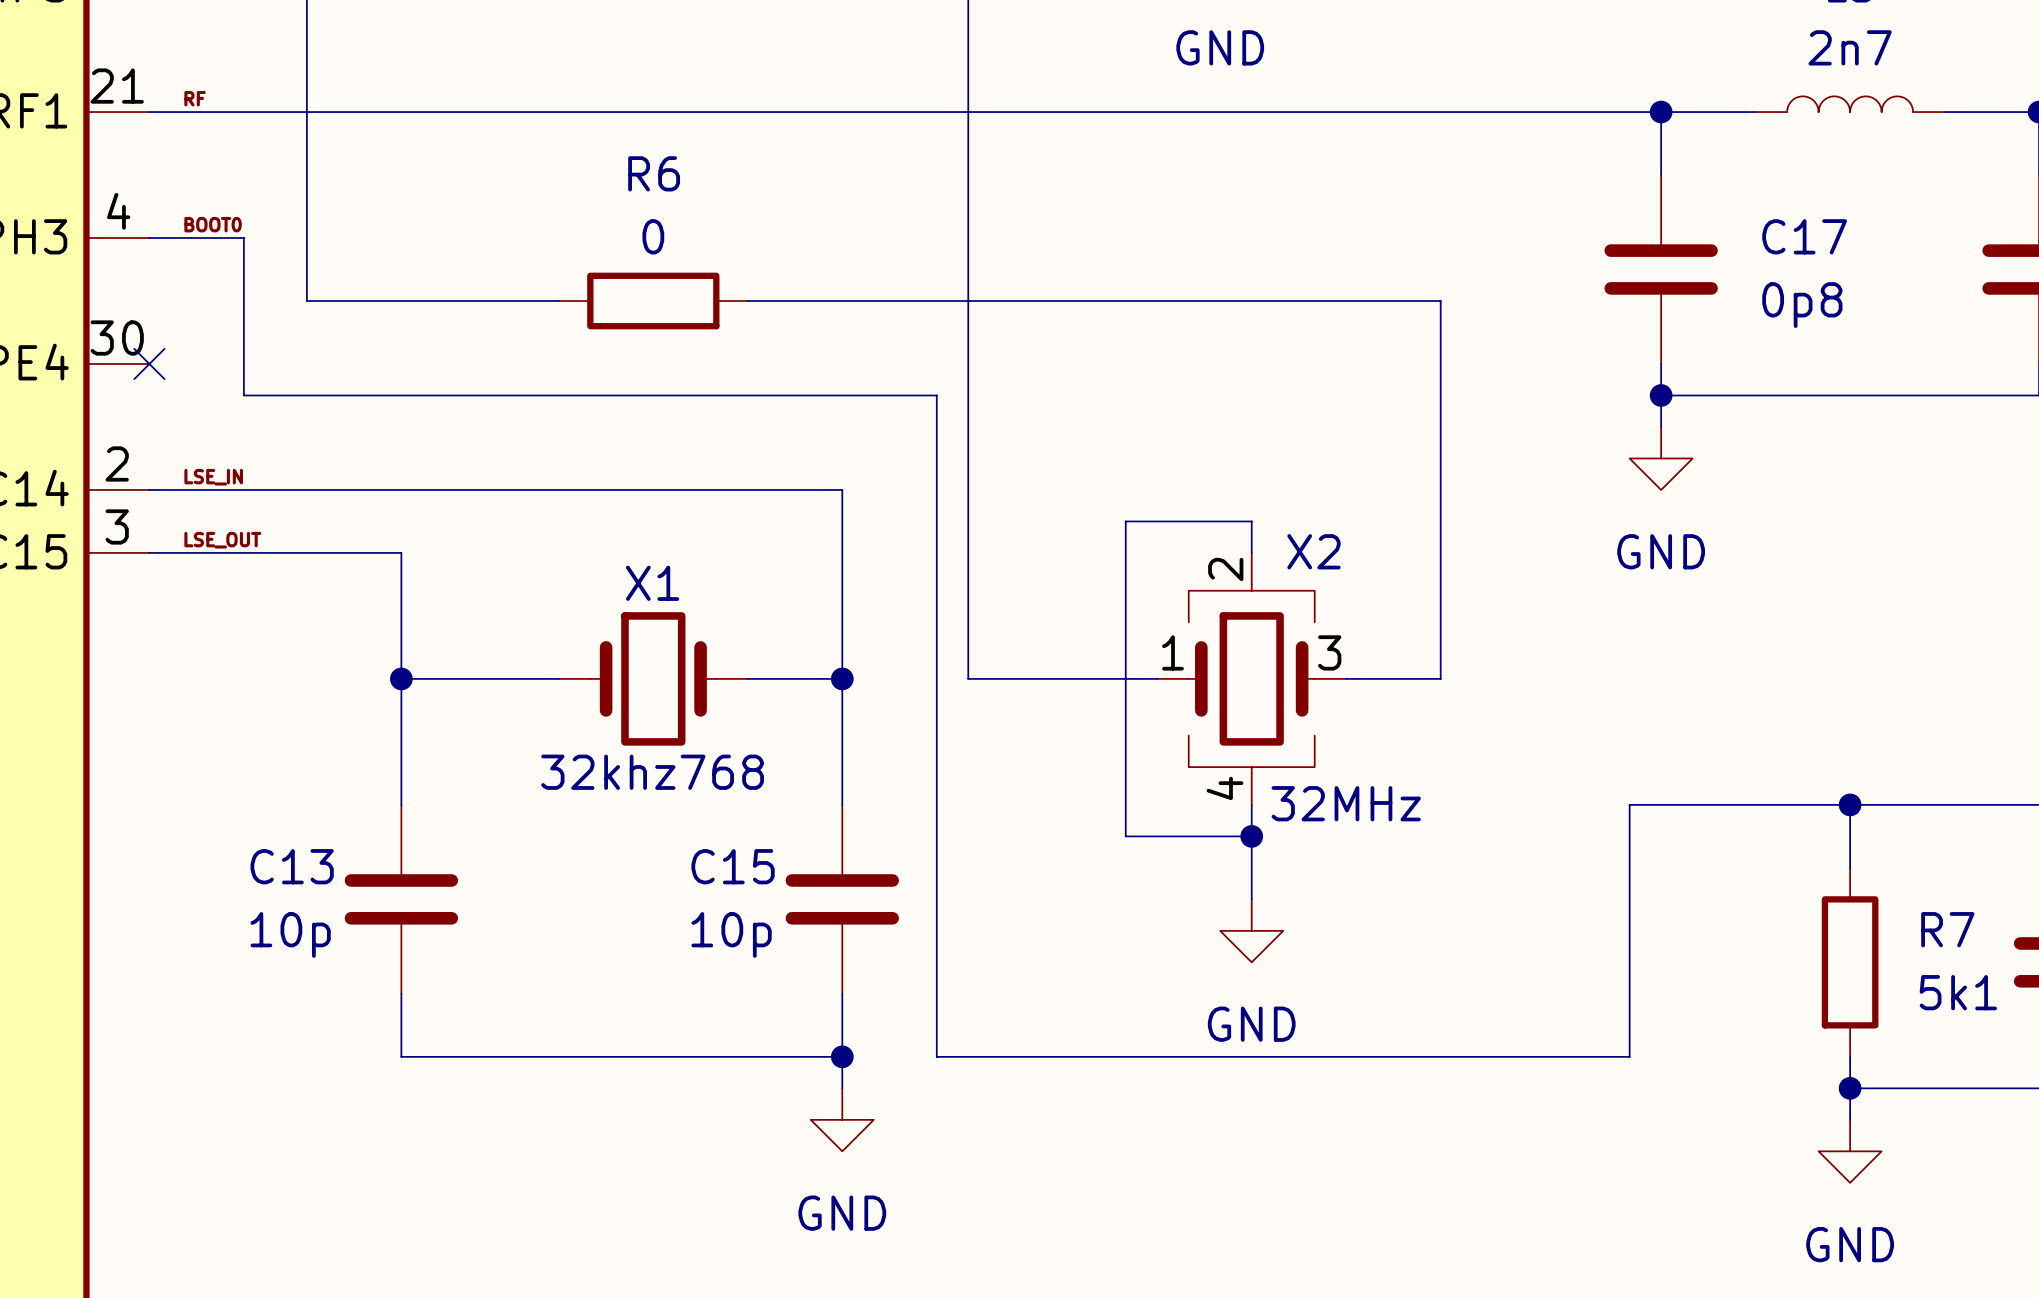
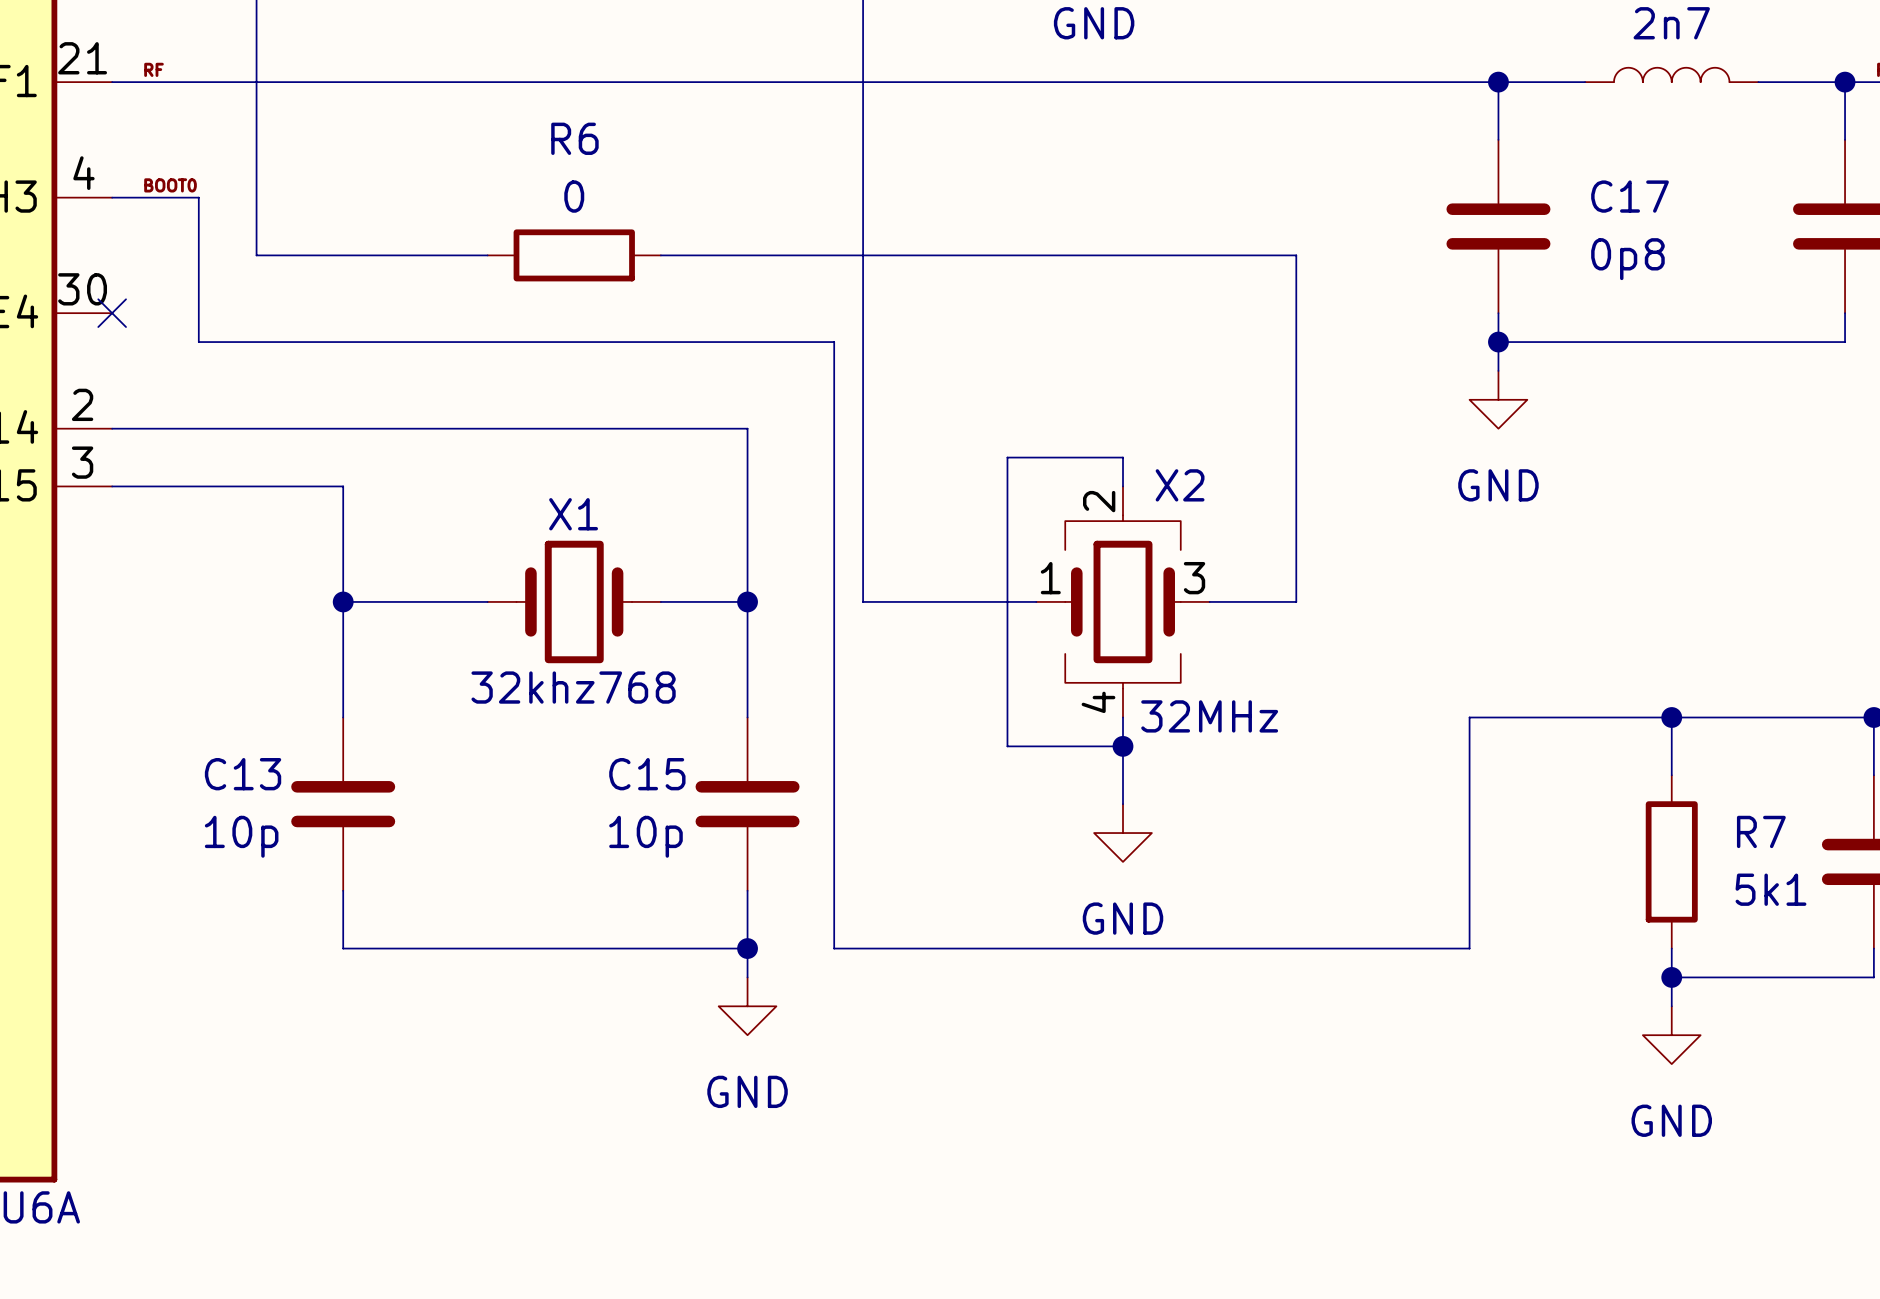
label: LSE_IN (213, 477) -> none
label: LSE_OUT (222, 540) -> none

